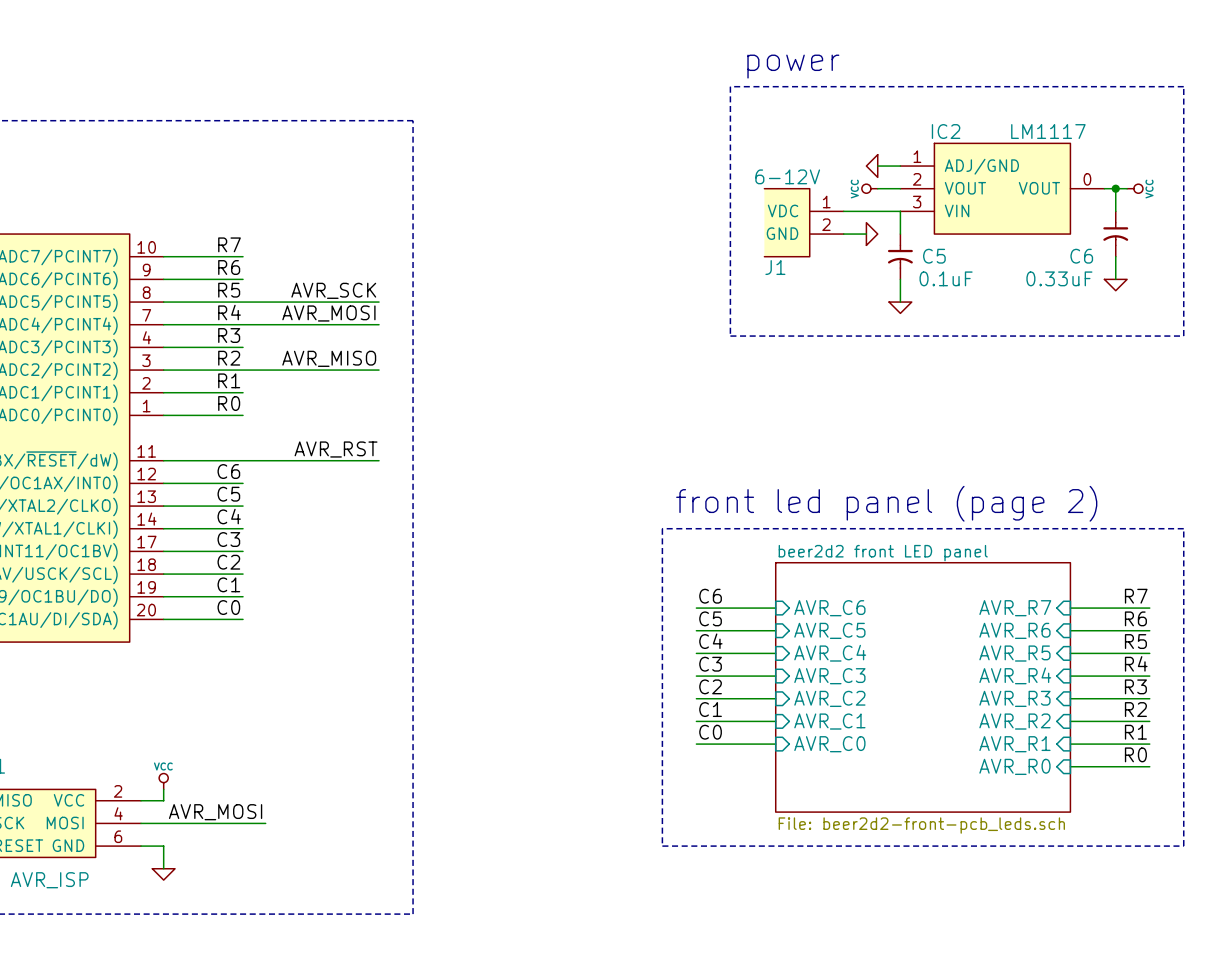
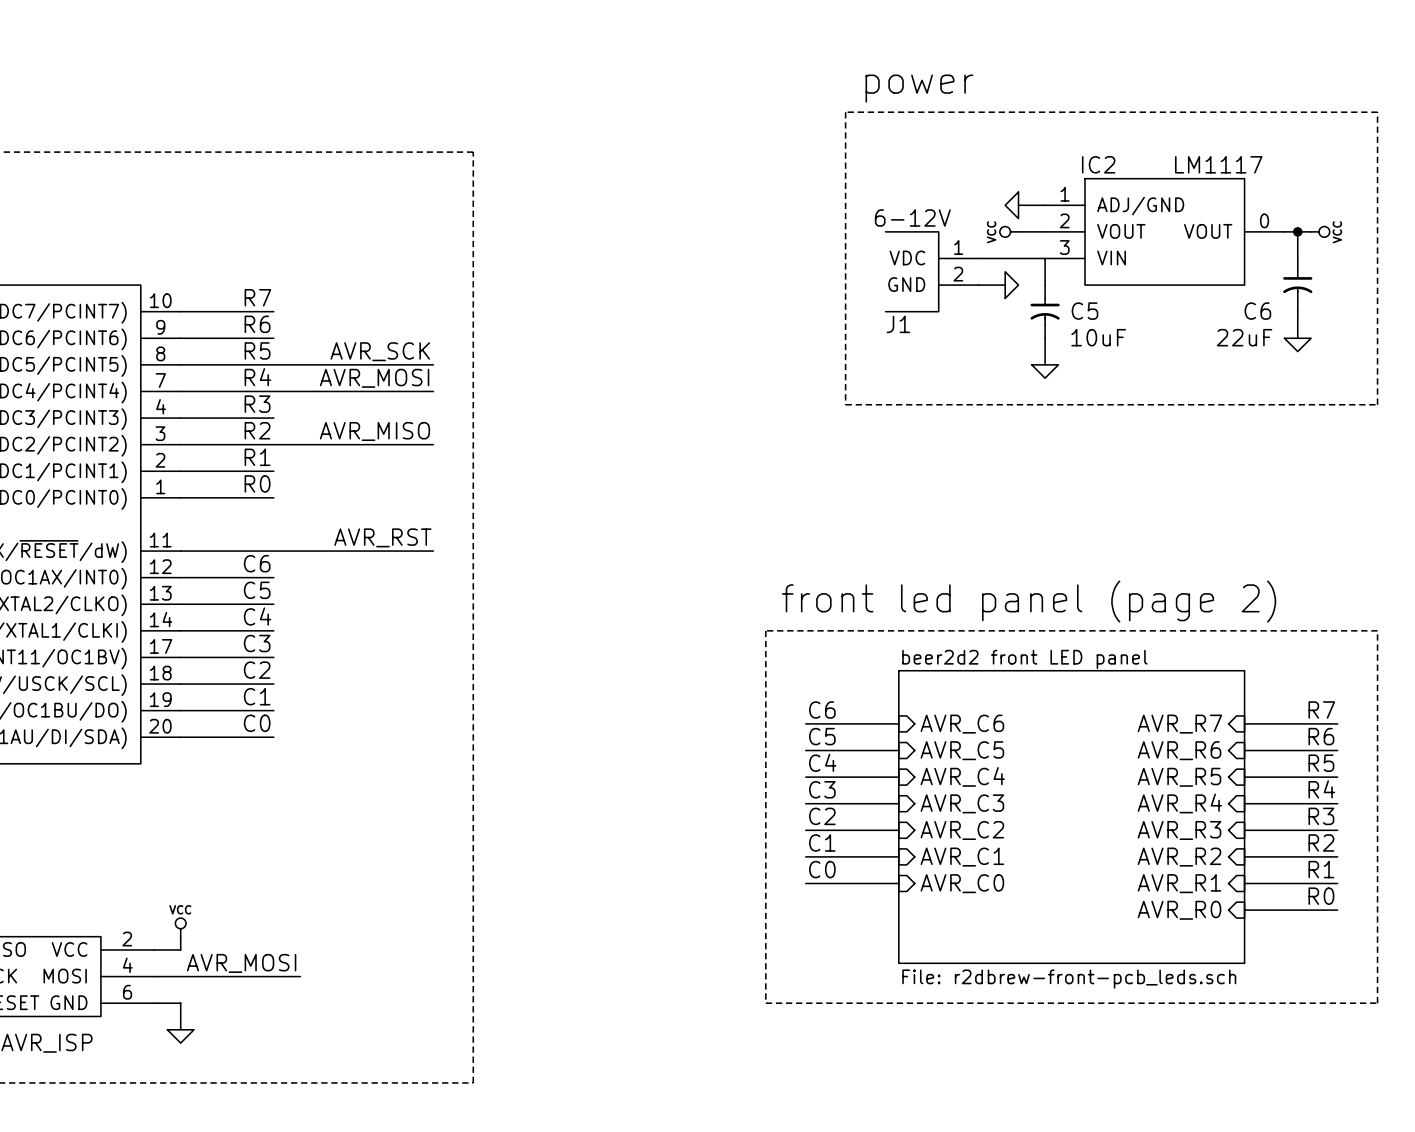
C5 value: 0.1uF (946, 278) -> 10uF (1098, 337)
C6 value: 0.33uF (1059, 278) -> 22uF (1244, 337)
sheet beer2d2 front LED panel value: File: beer2d2-front-pcb_leds.sch (921, 825) -> File: r2dbrew-front-pcb_leds.sch (1069, 979)

